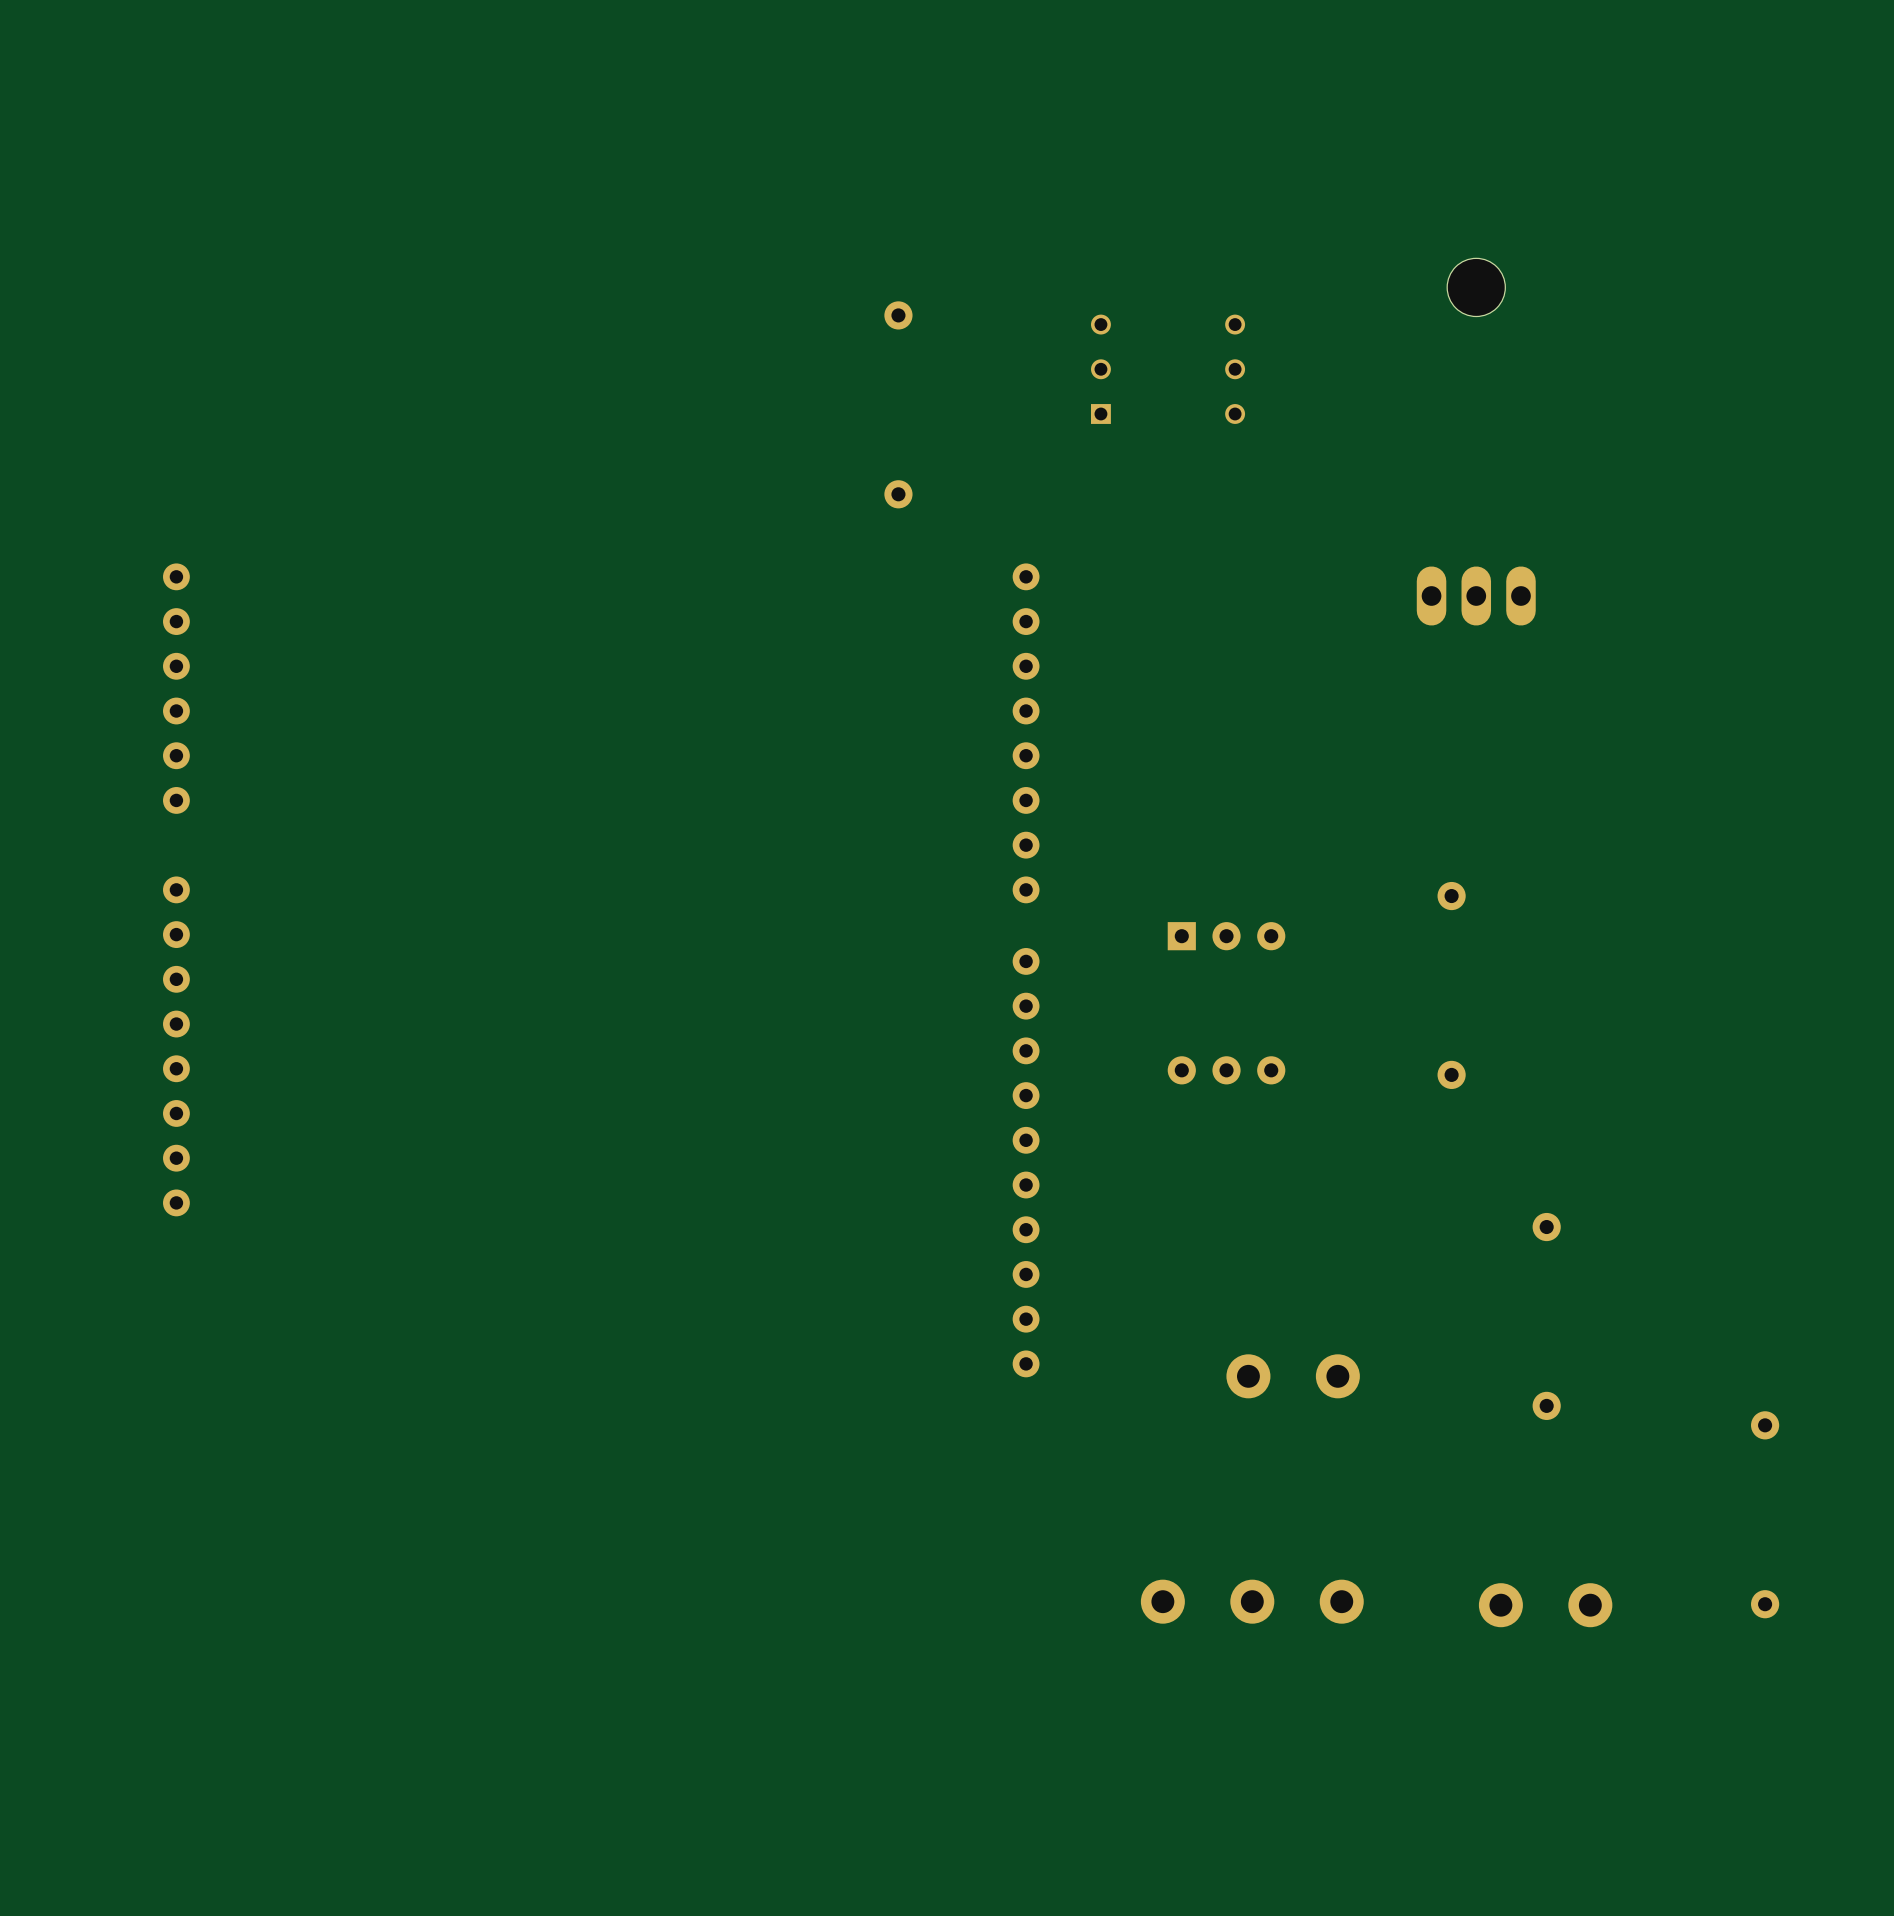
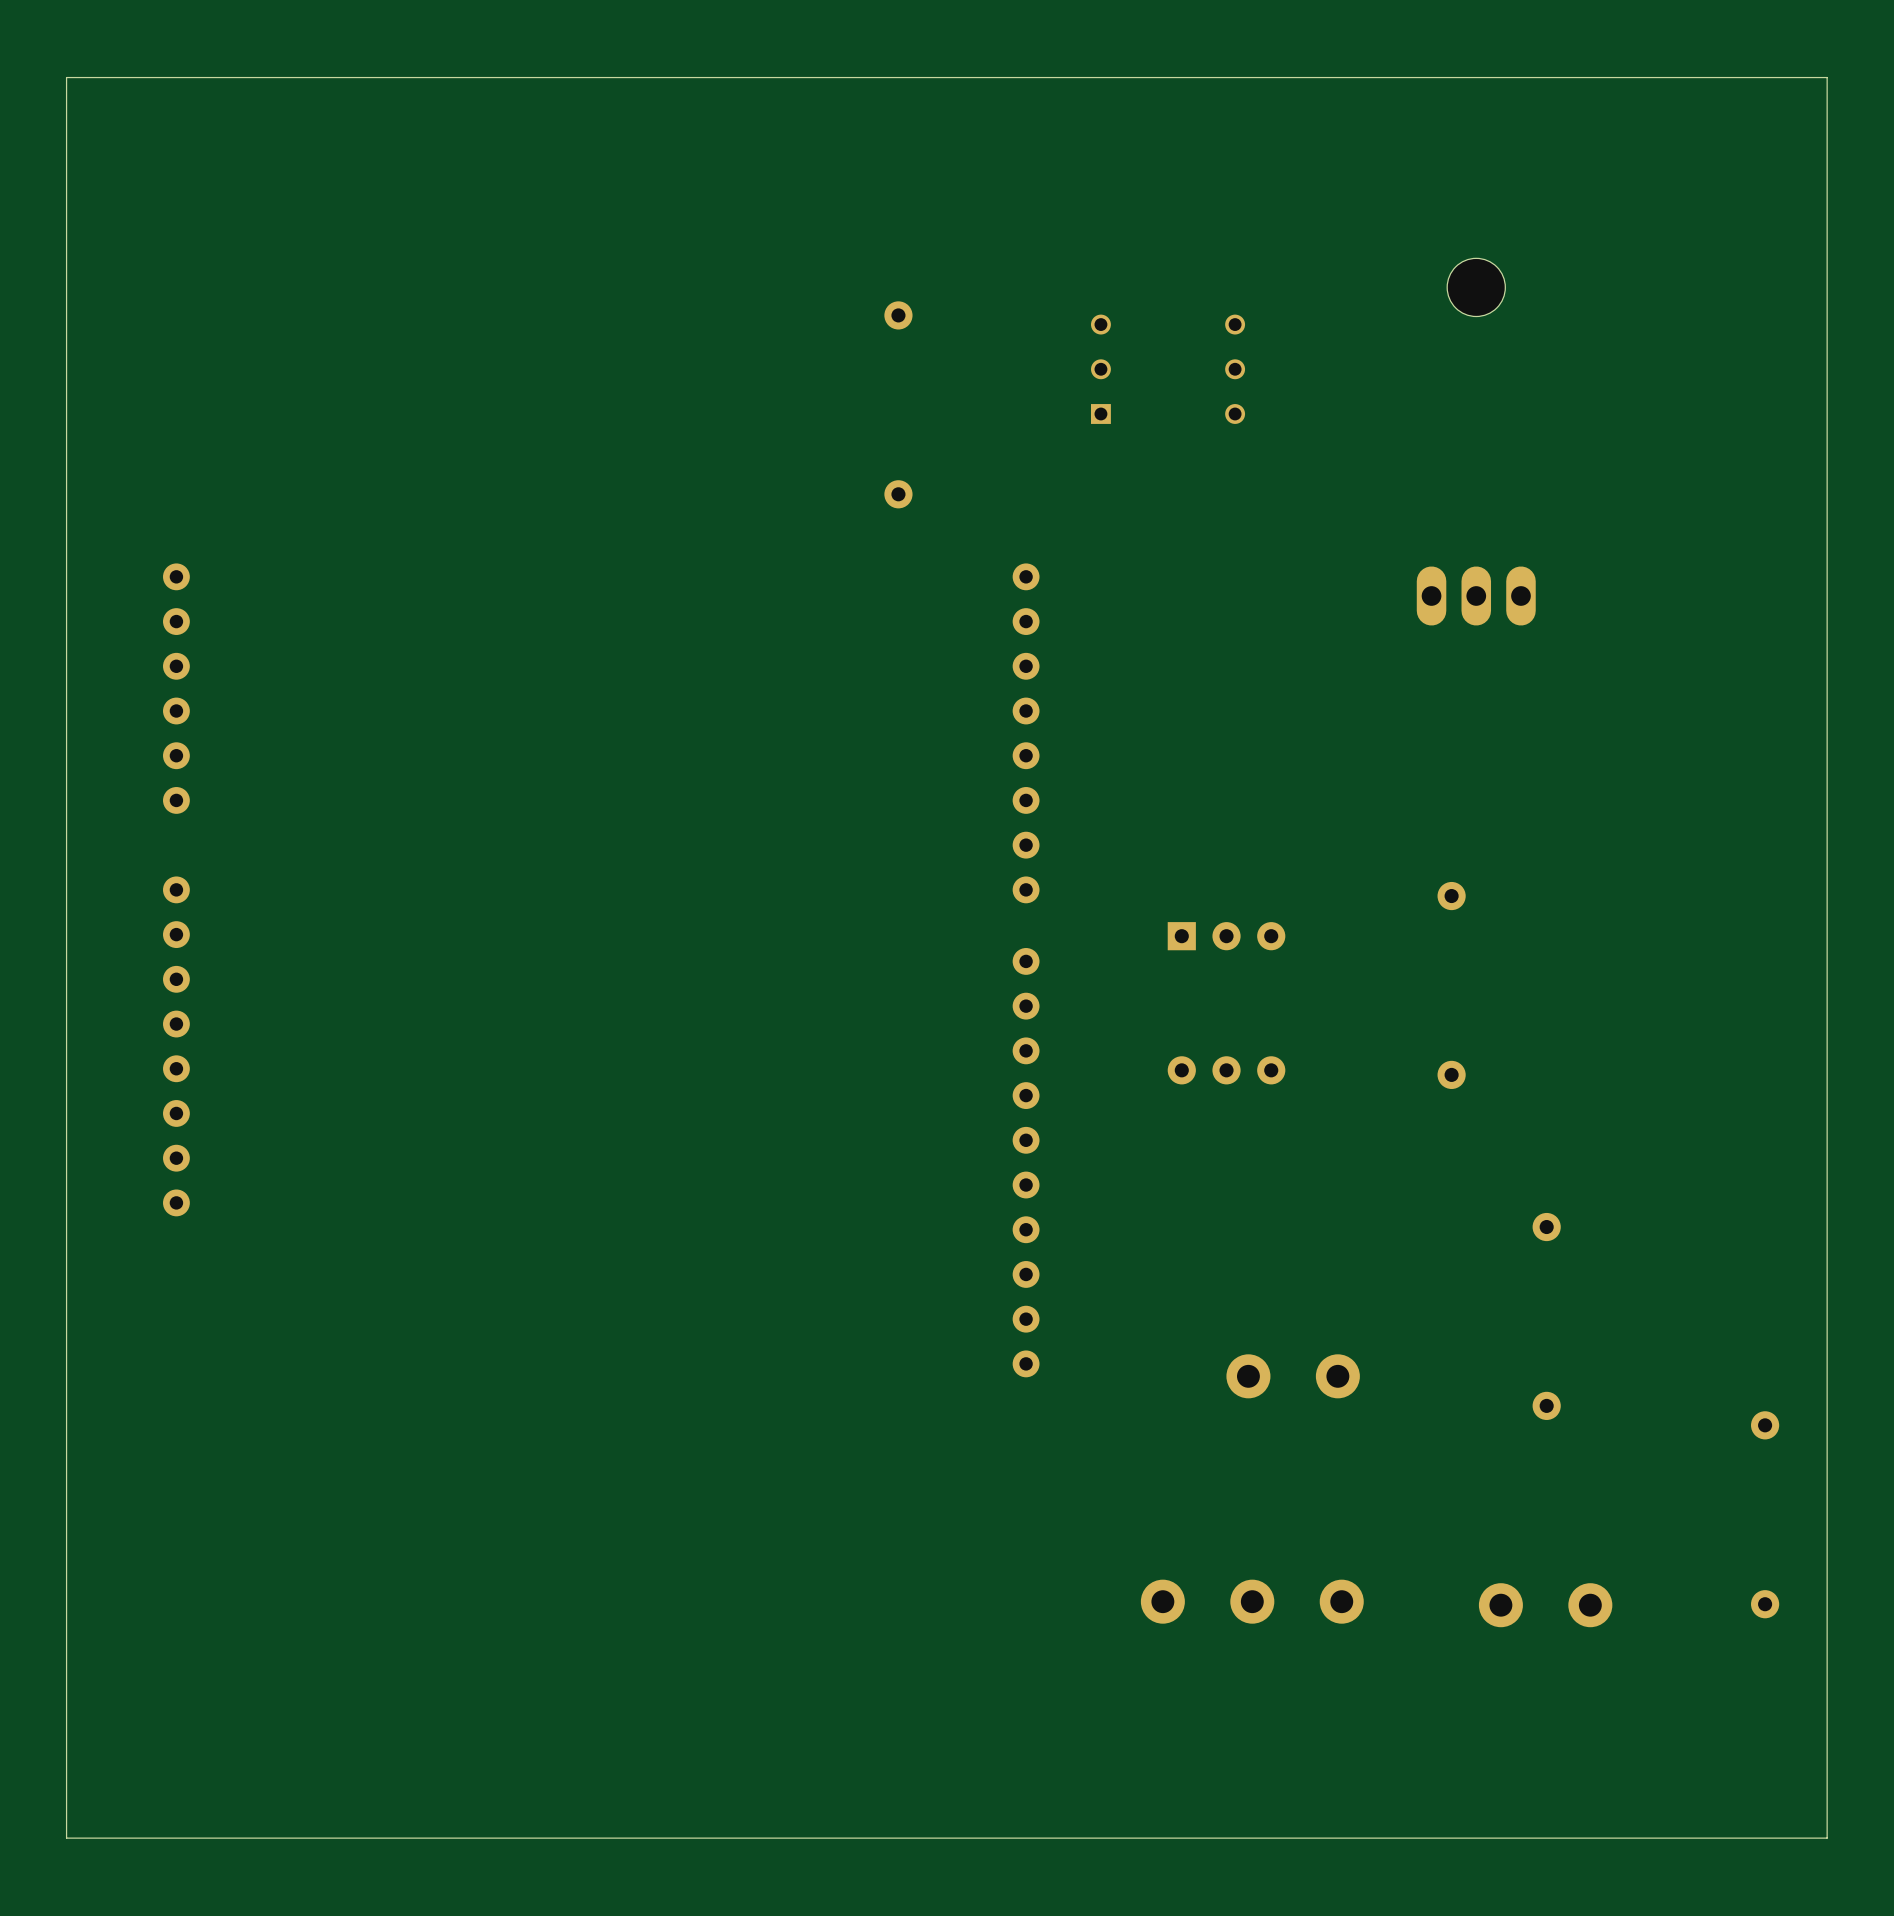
board edge: none -> (1827, 77) (66, 77) (66, 1838) (1827, 1838) (1827, 77)

